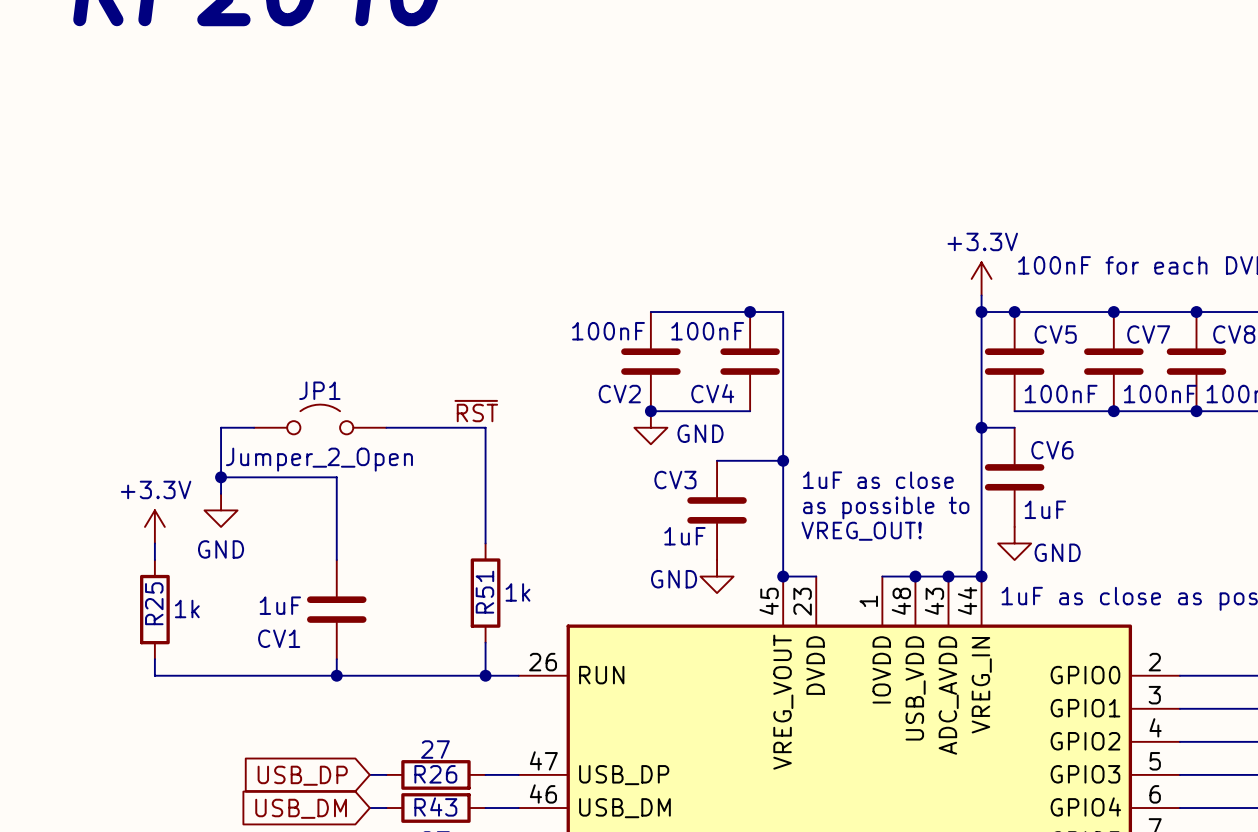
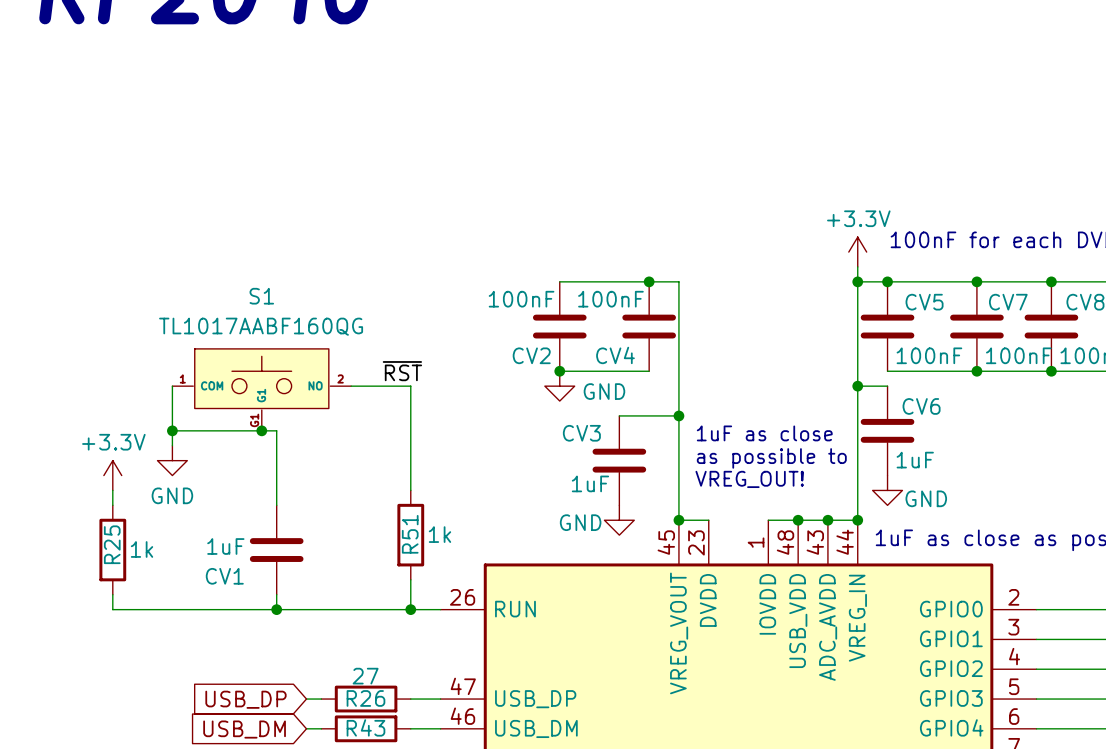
JP1: Jumper_2_Open (320, 419) -> none
S1: none -> TL1017AABF160QG (261, 389)
junction: none -> (261, 430)

